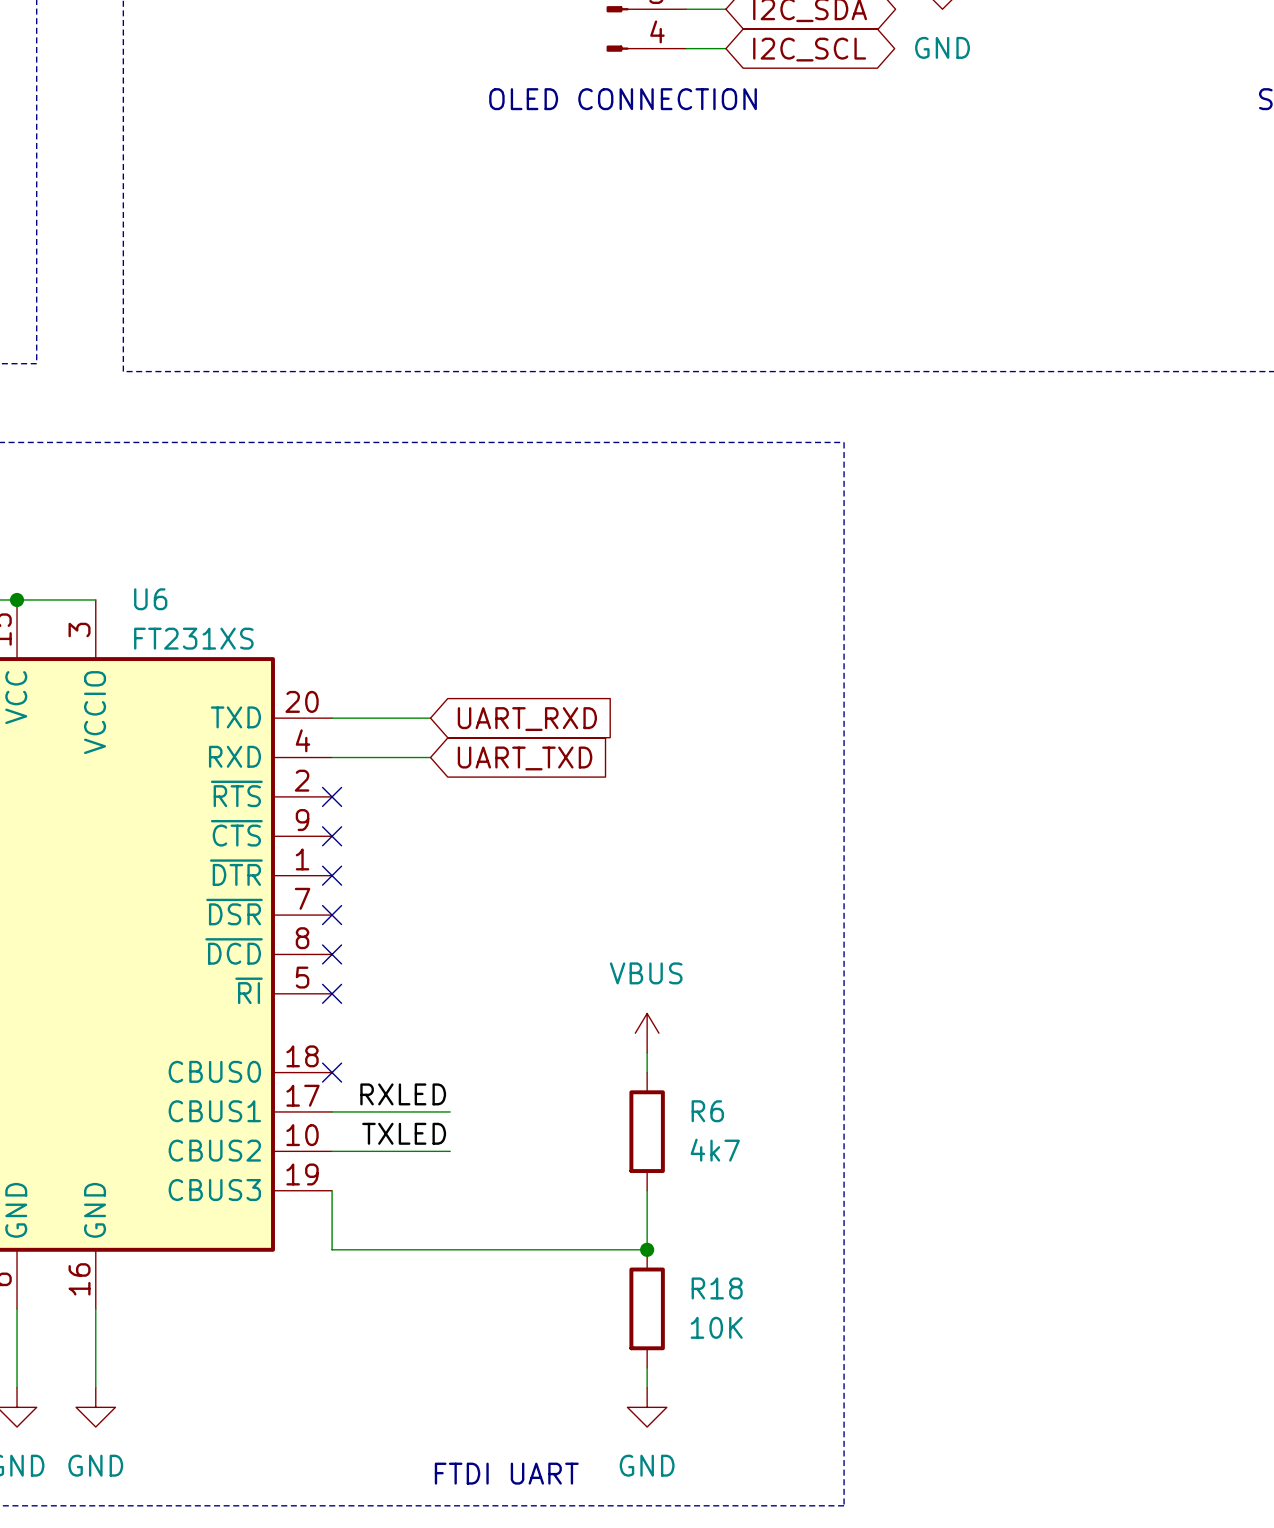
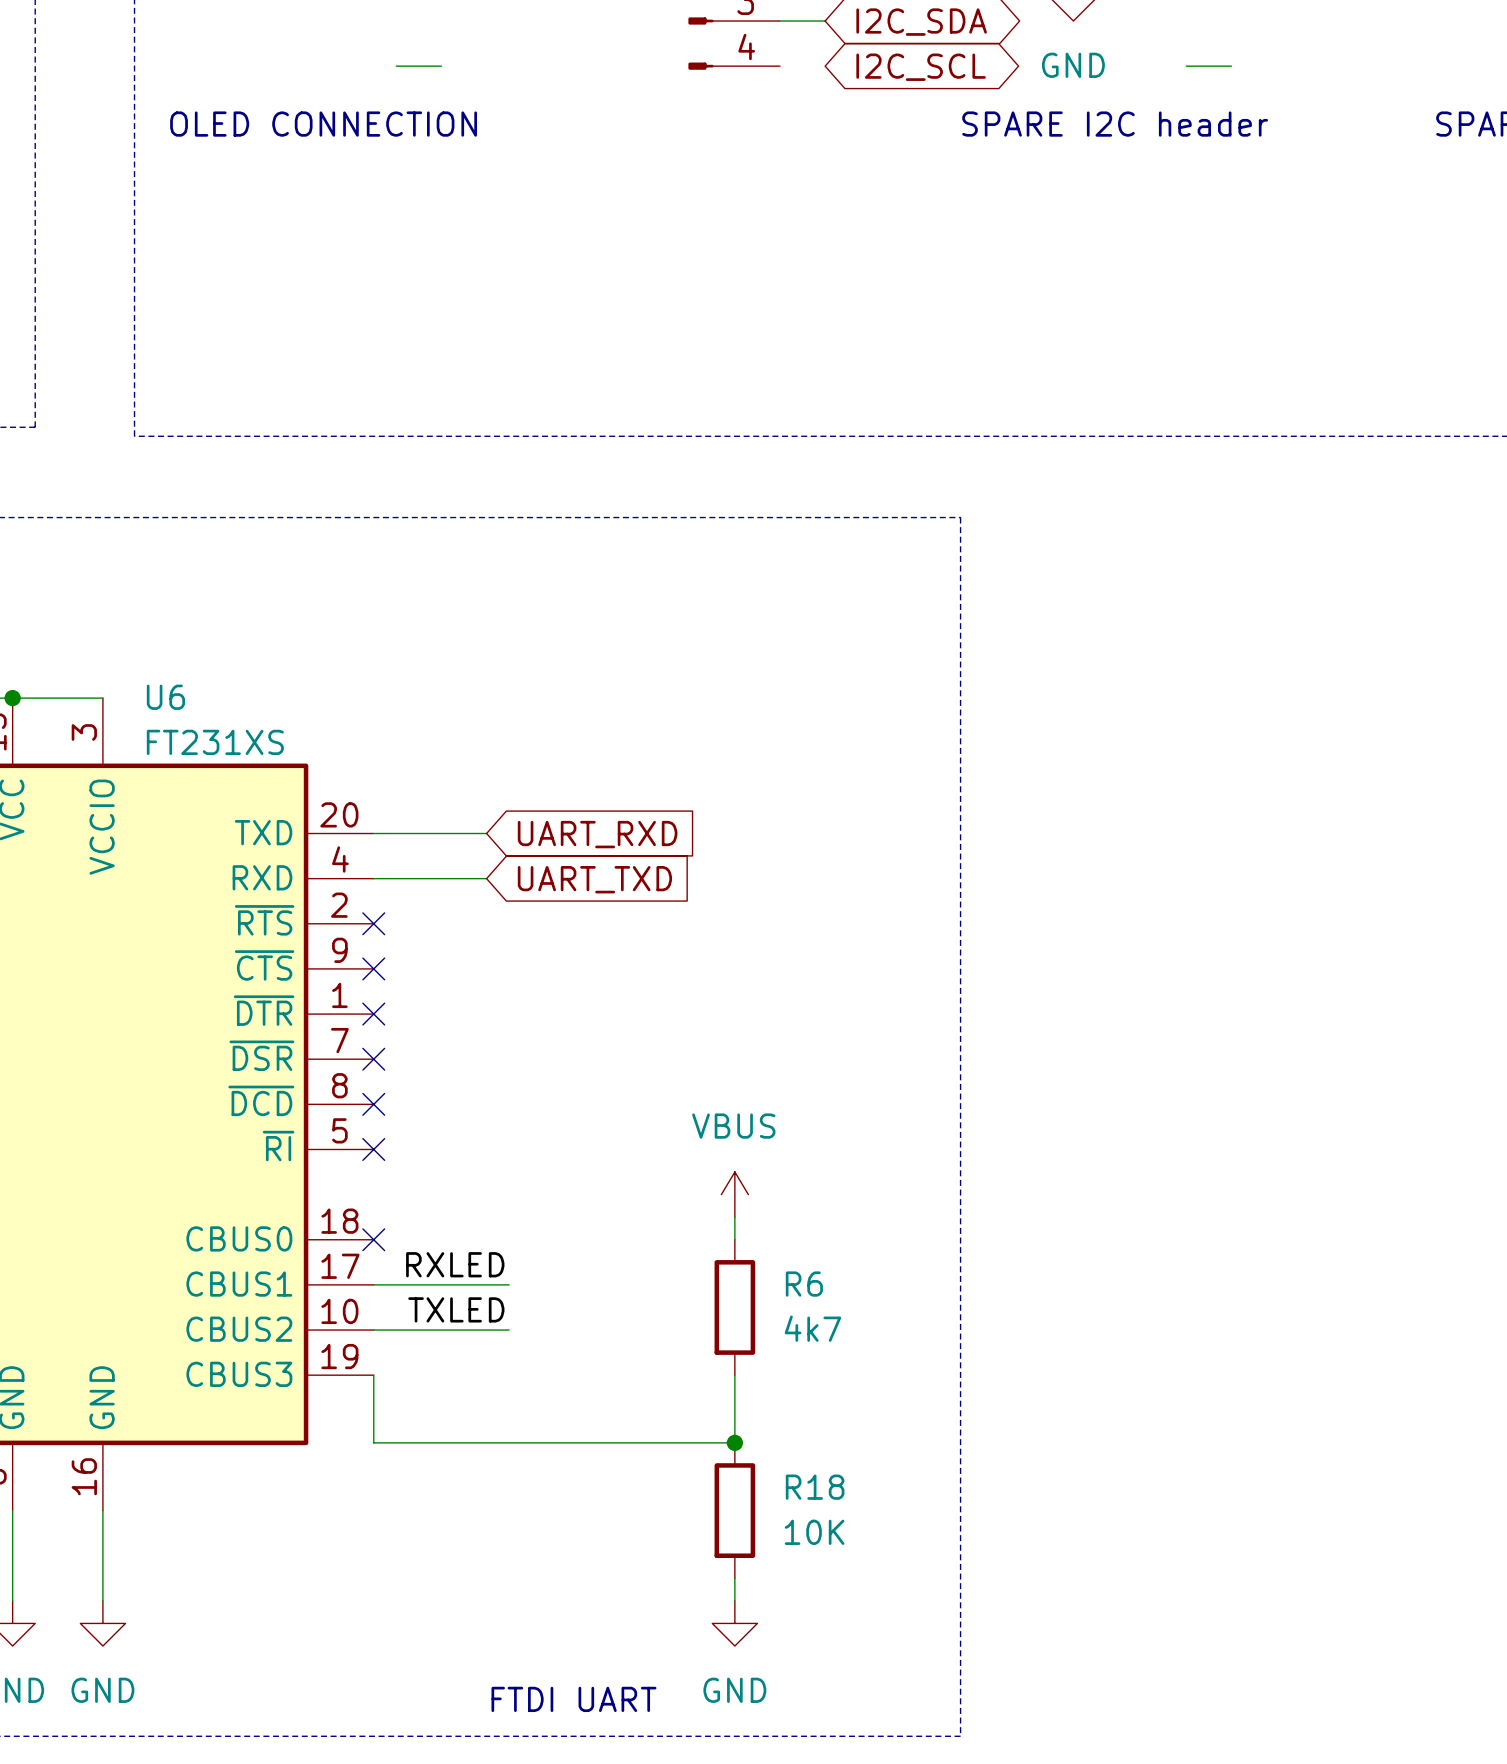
wire: (686, 48) (725, 48) -> (396, 66) (441, 66)
wire: none -> (1186, 66) (1231, 66)
text position: OLED CONNECTION (623, 99) -> OLED CONNECTION (323, 124)
text: none -> SPARE I2C header (1115, 124)

